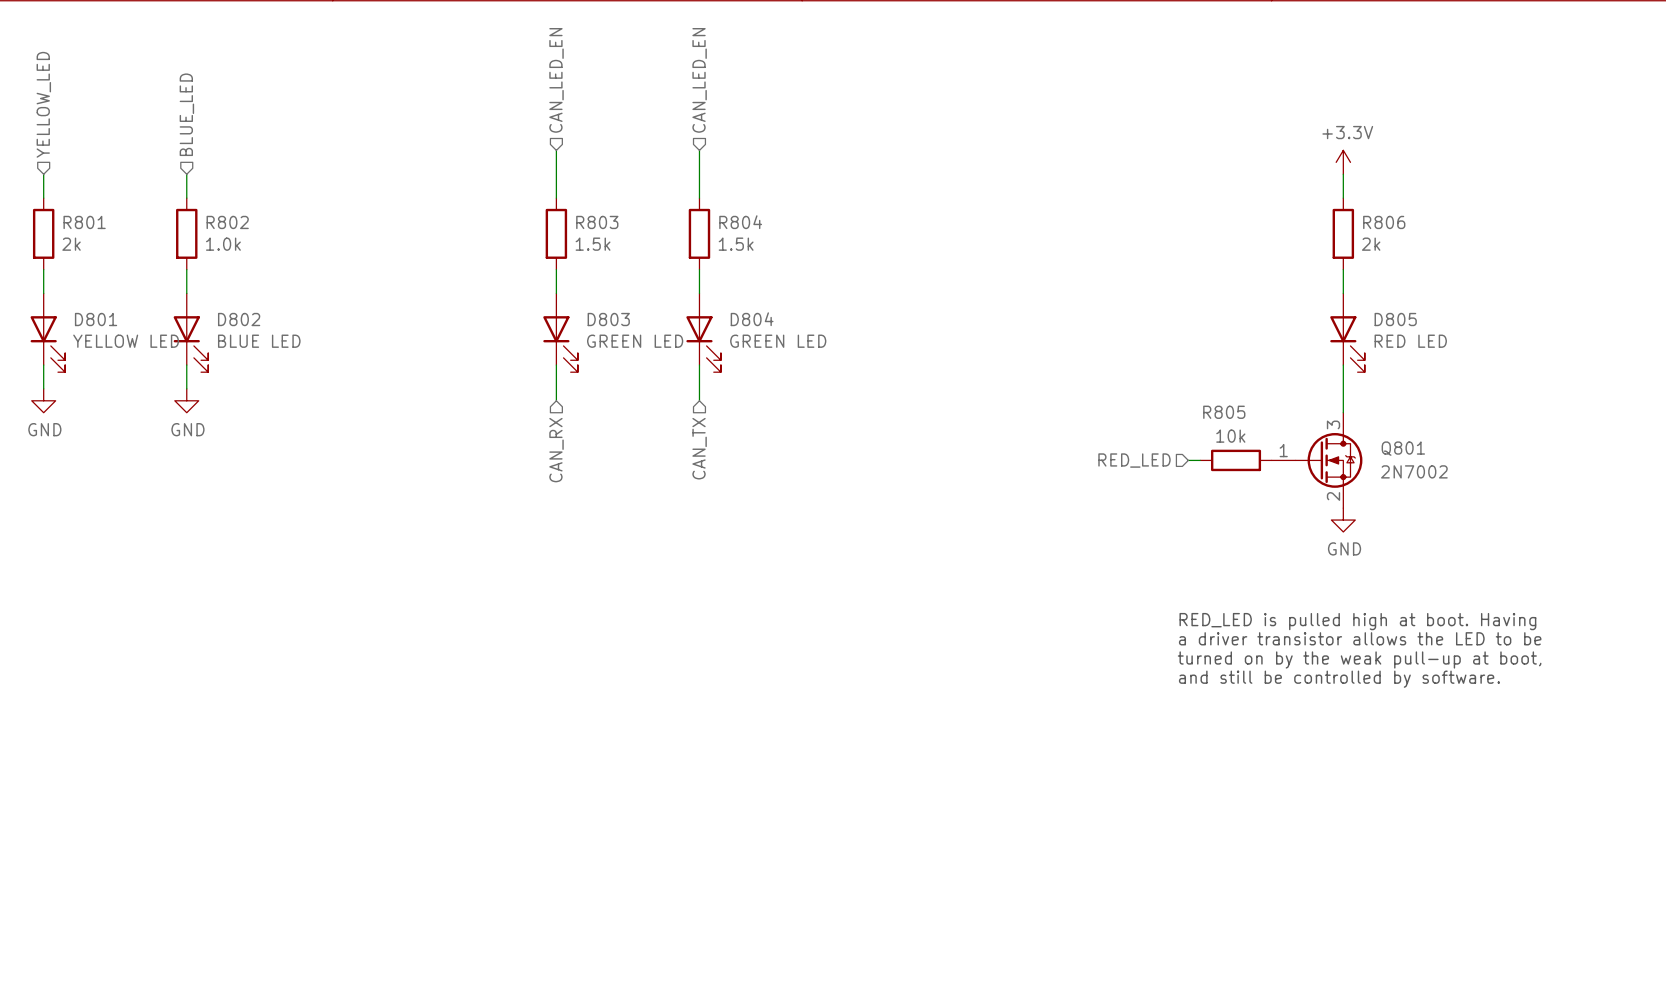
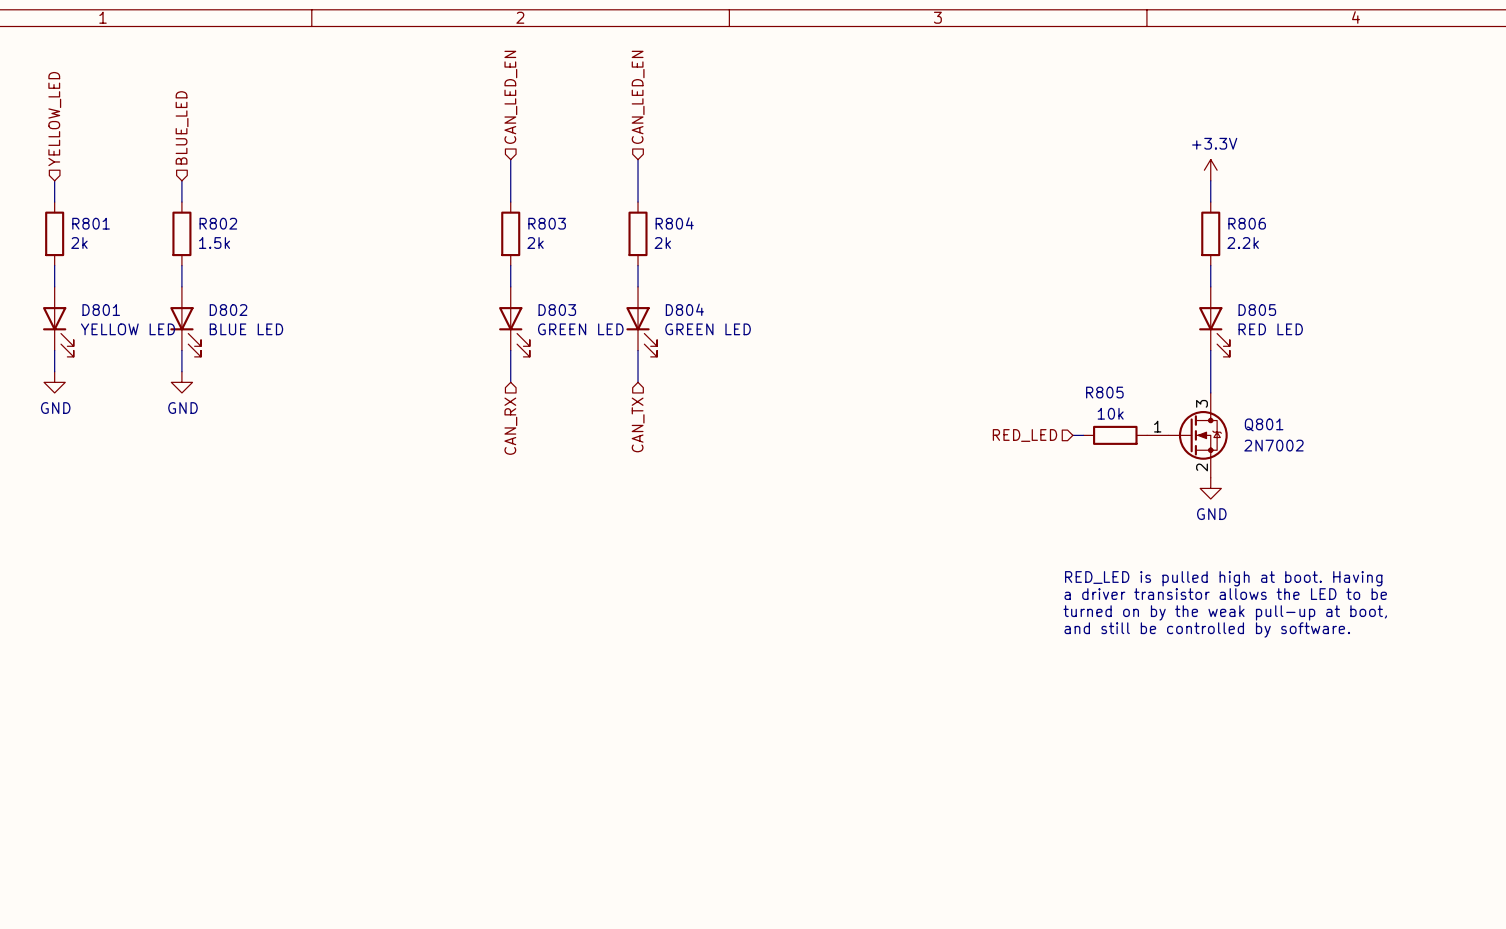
R802 value: 1.0k (223, 244) -> 1.5k (214, 243)
R803 value: 1.5k (593, 244) -> 2k (535, 243)
R804 value: 1.5k (736, 244) -> 2k (662, 243)
R806 value: 2k (1371, 244) -> 2.2k (1243, 243)

